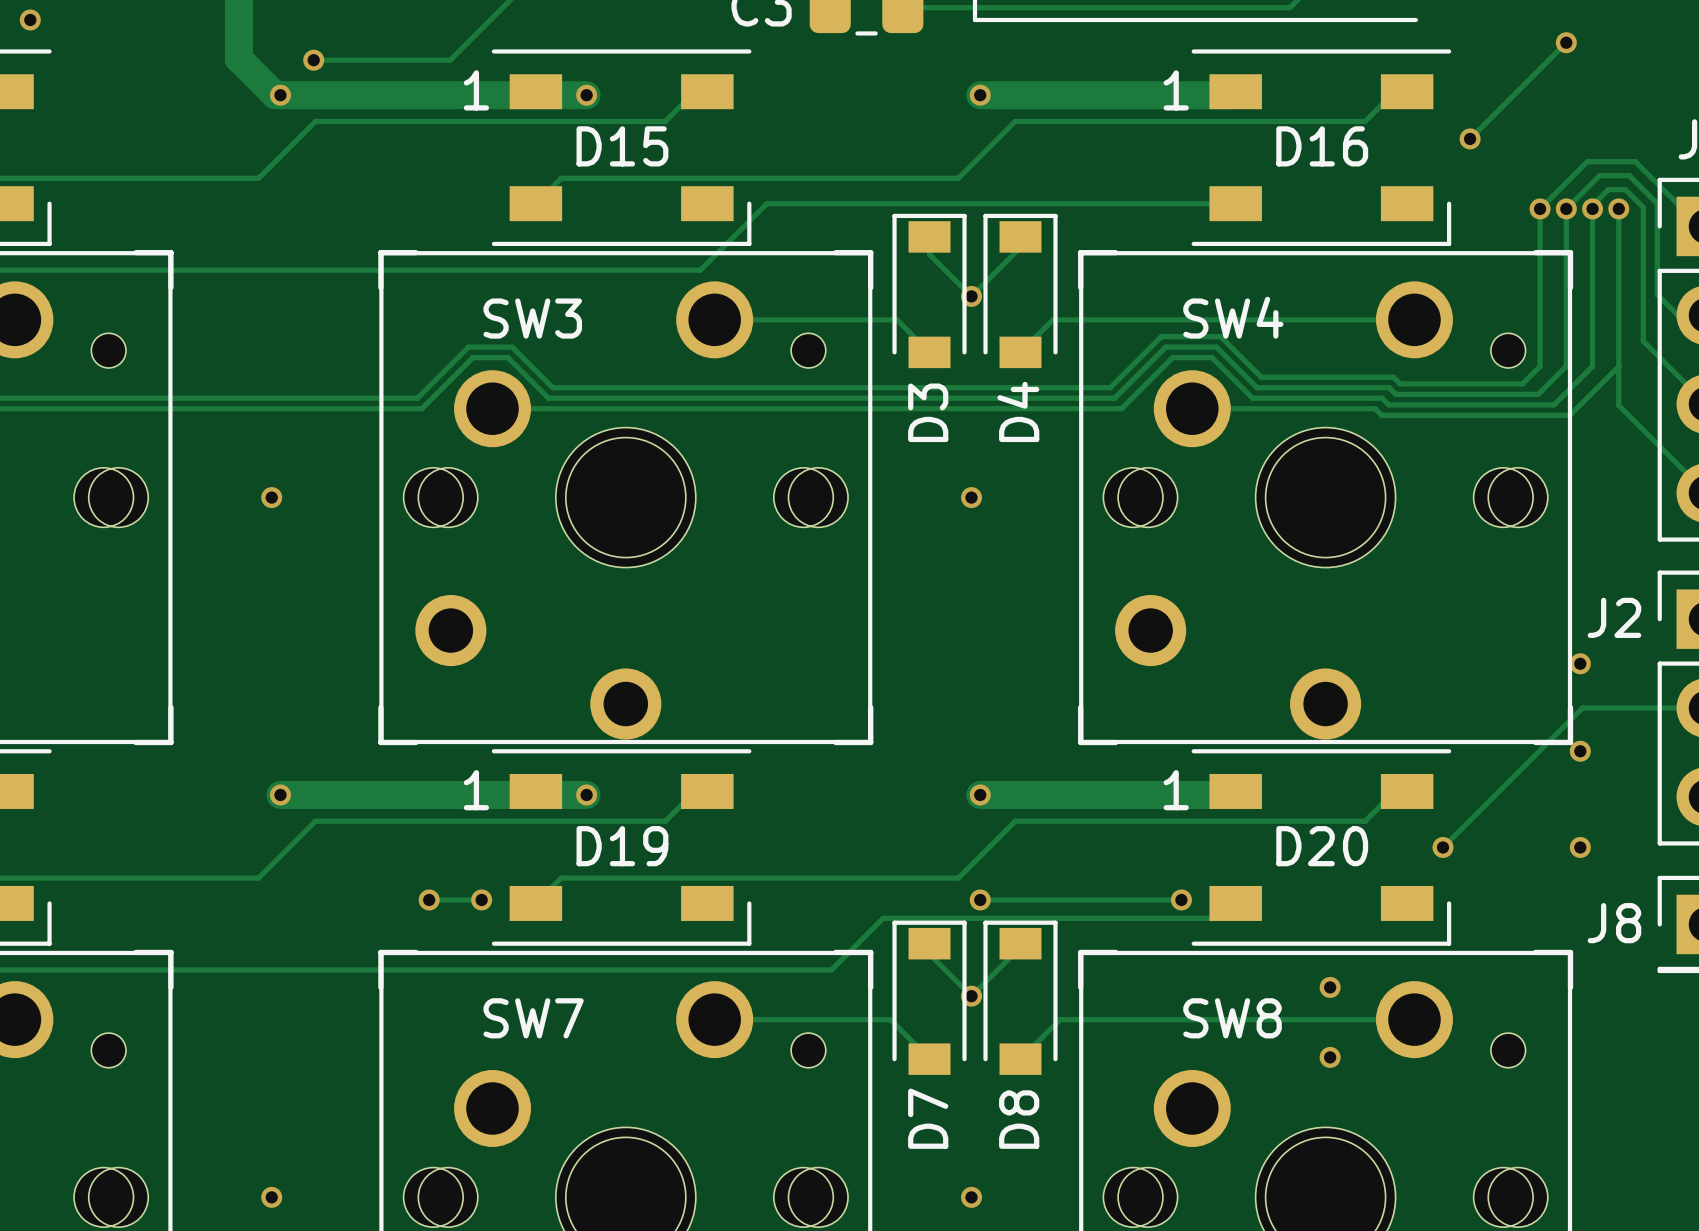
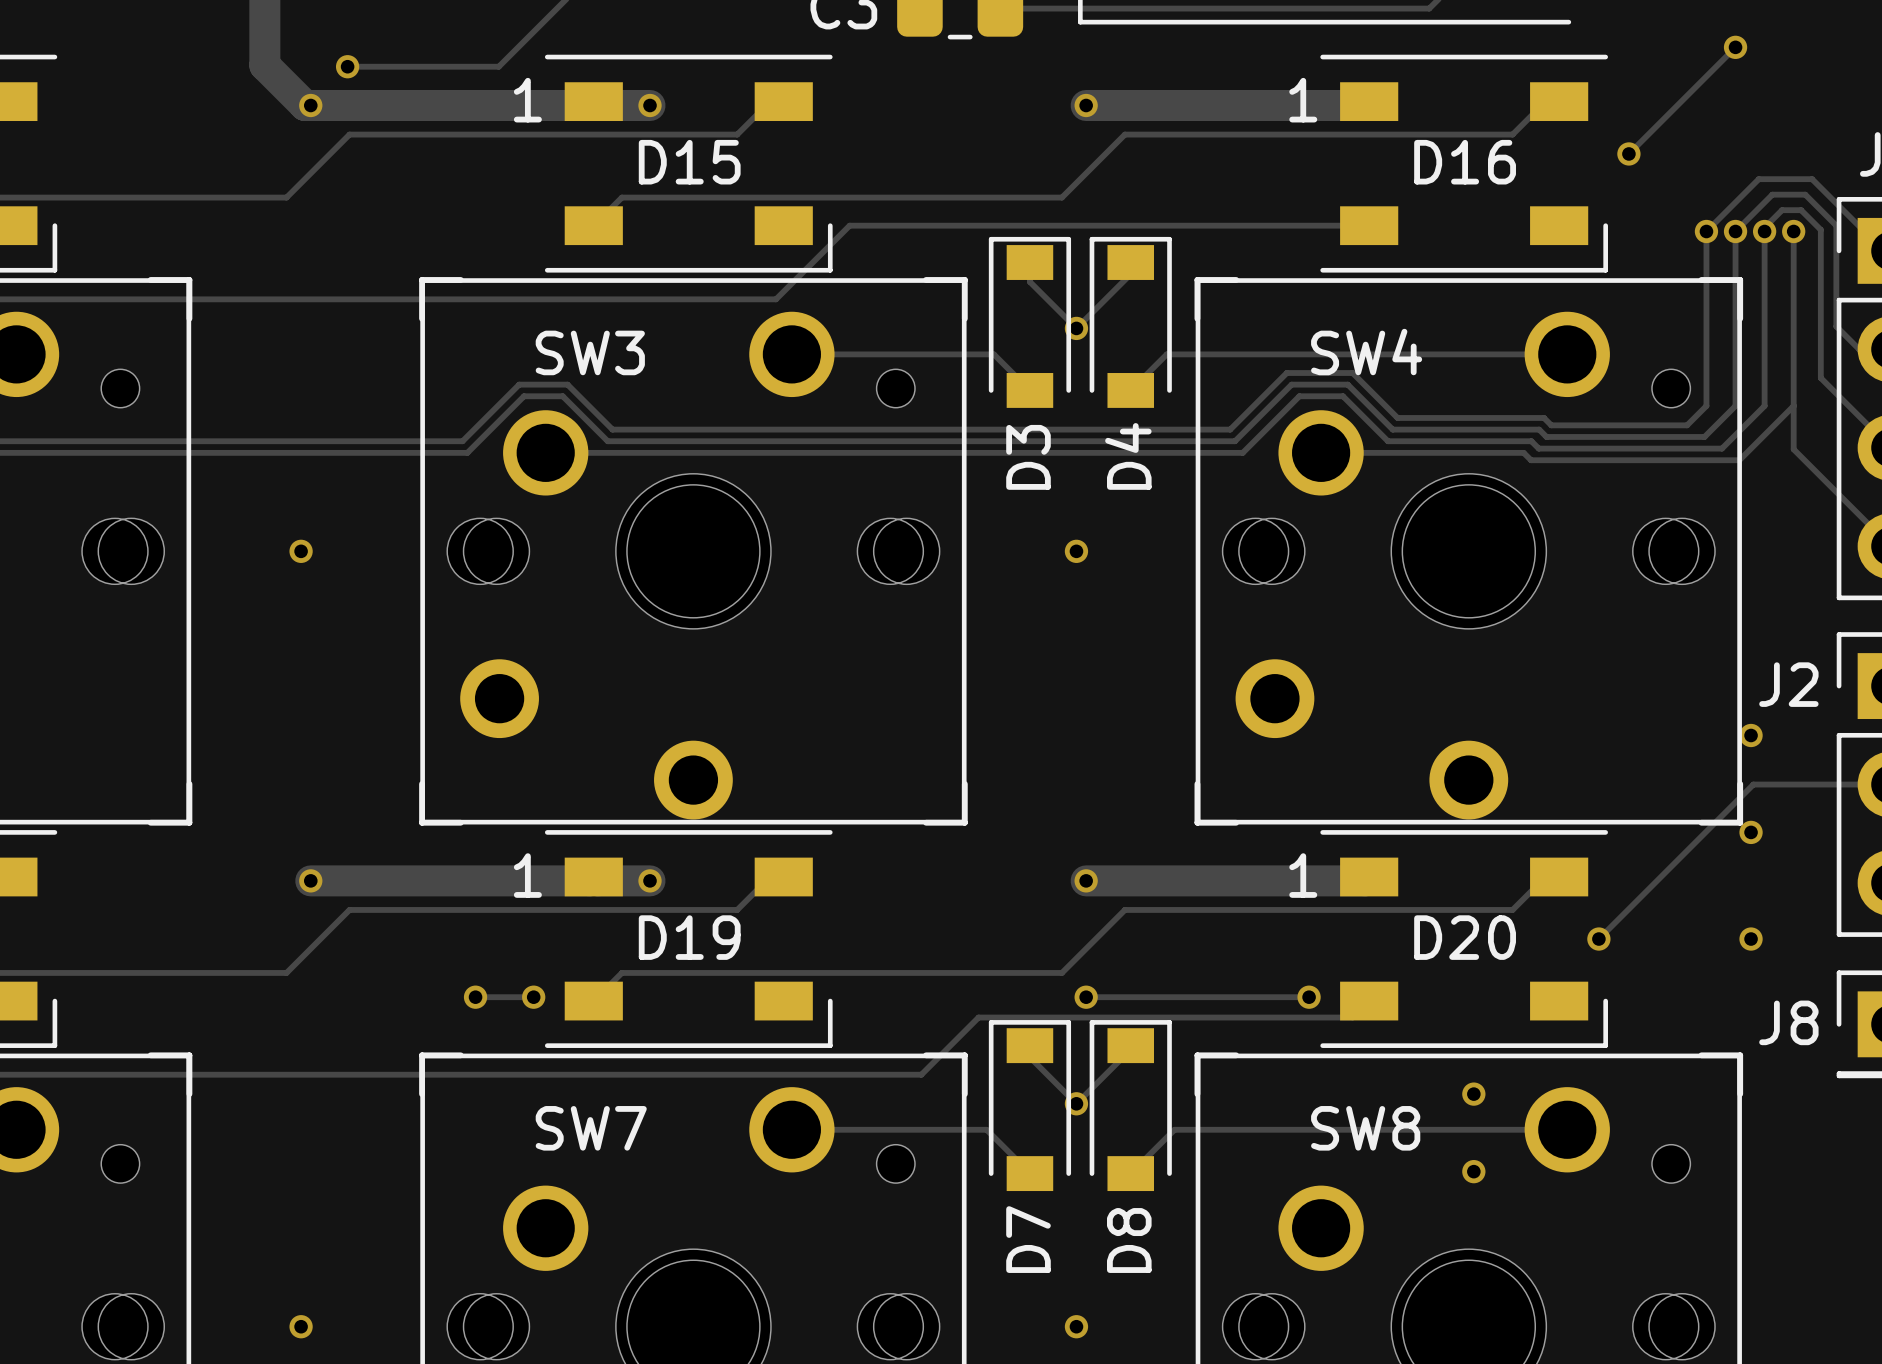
via: (30, 19) -> none

